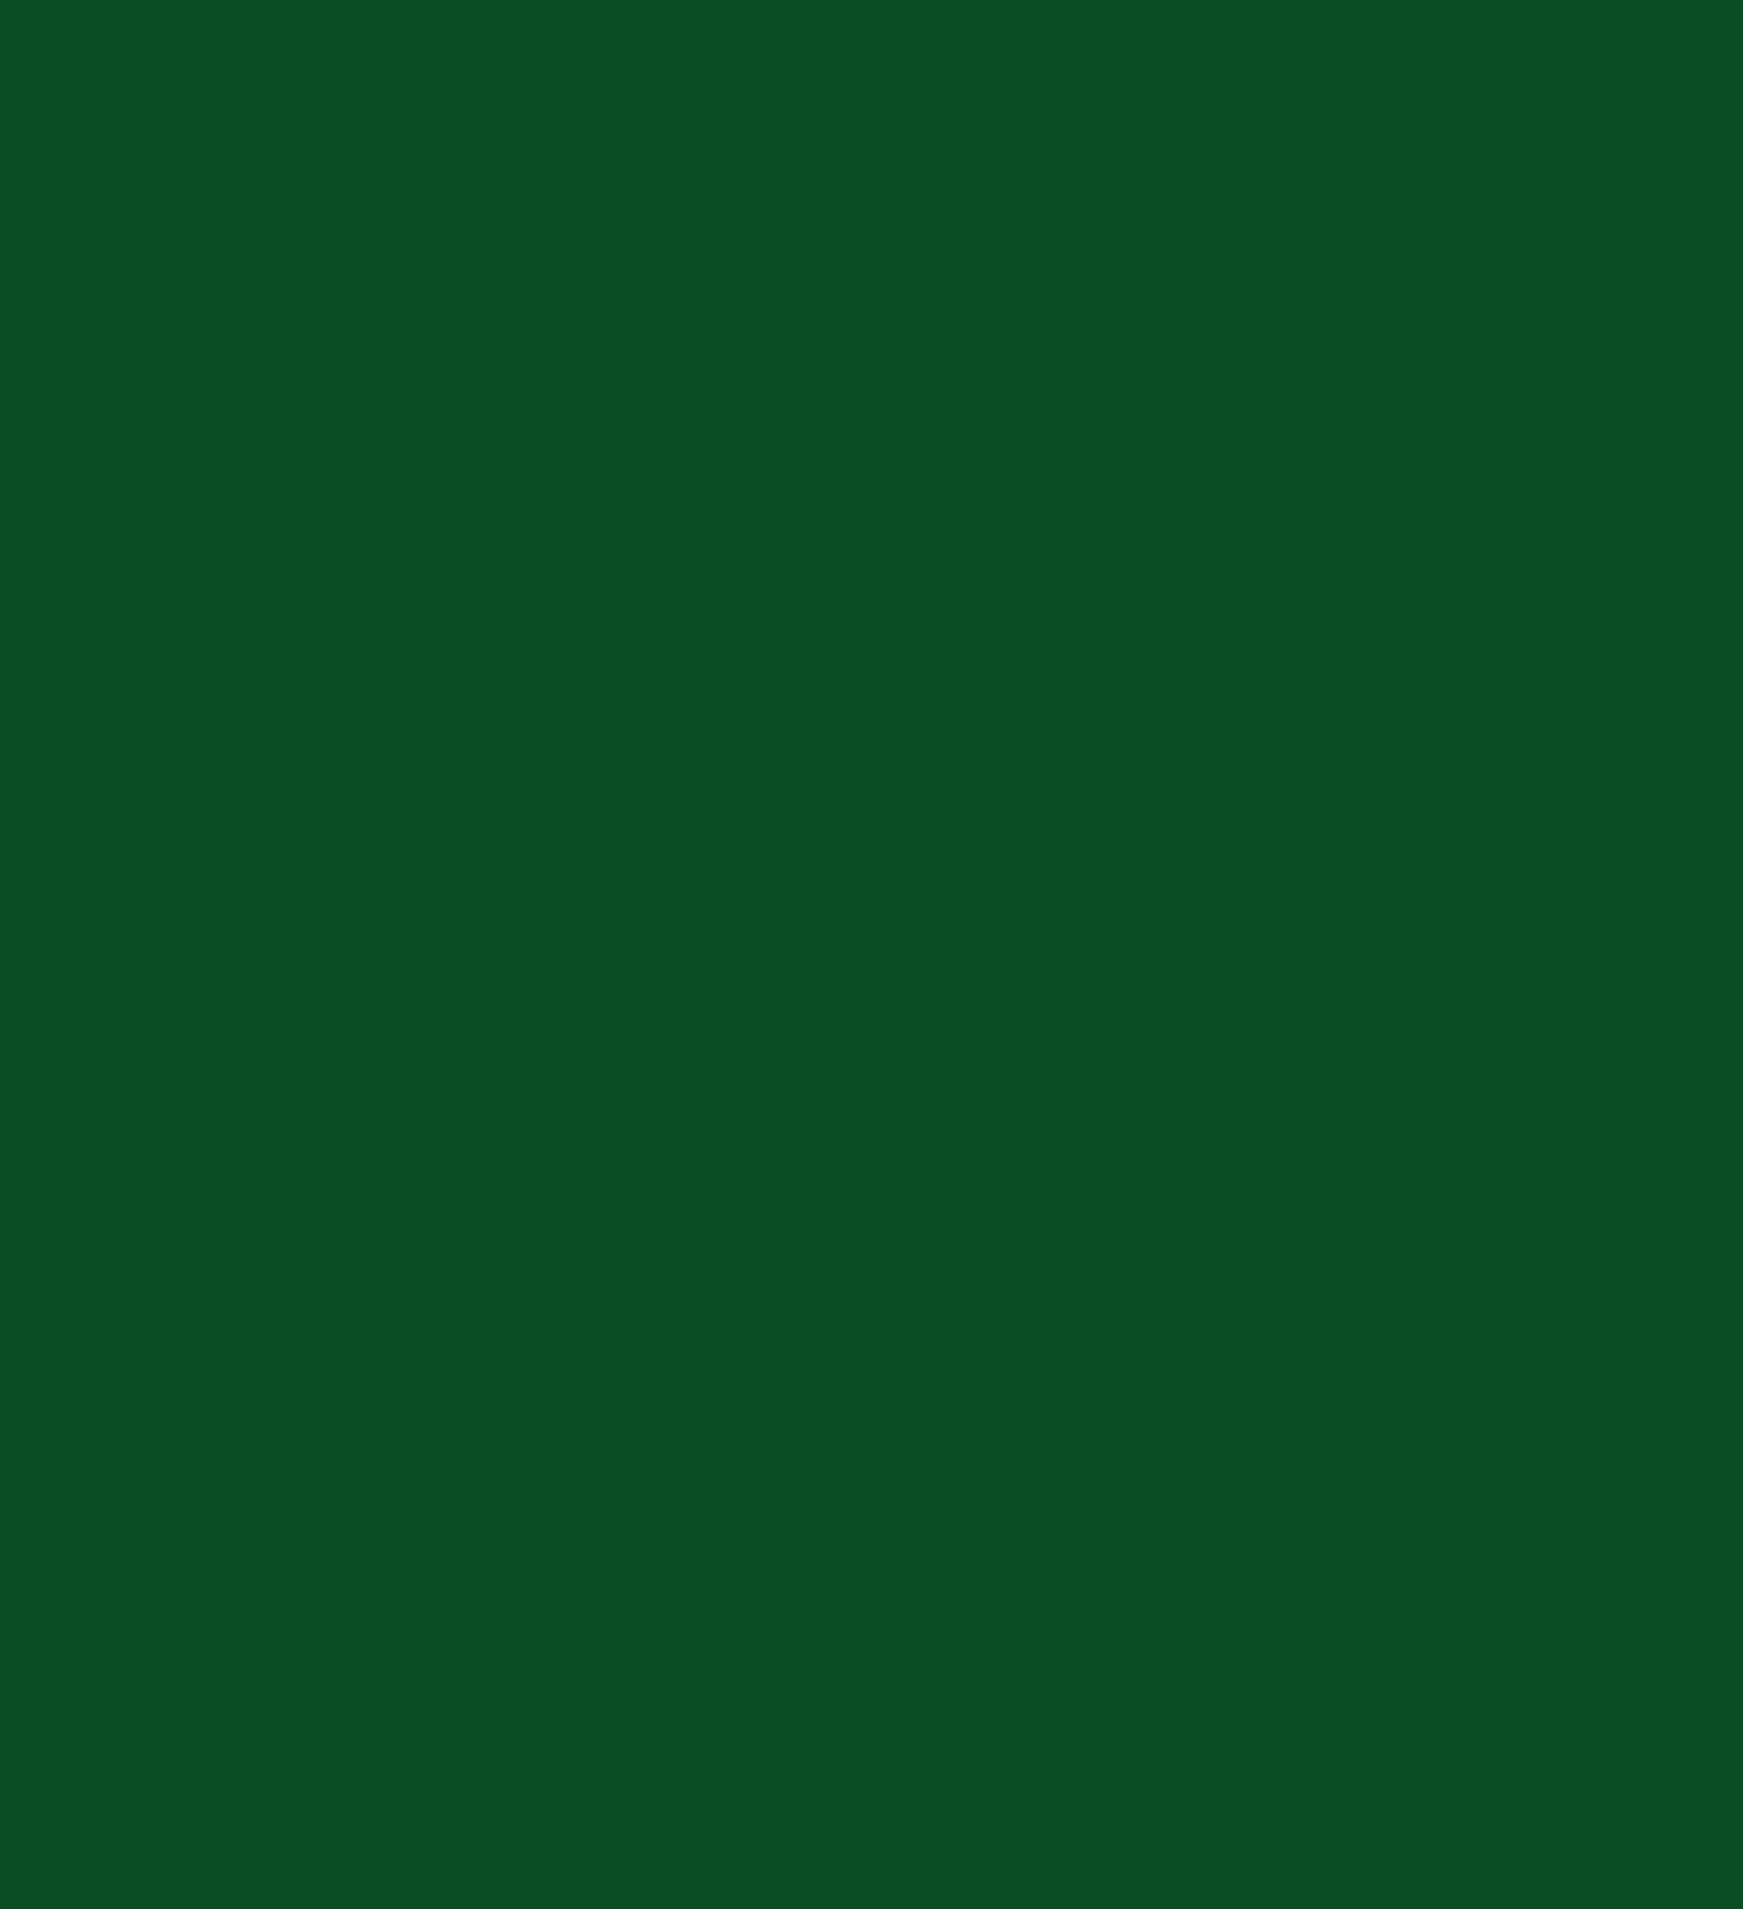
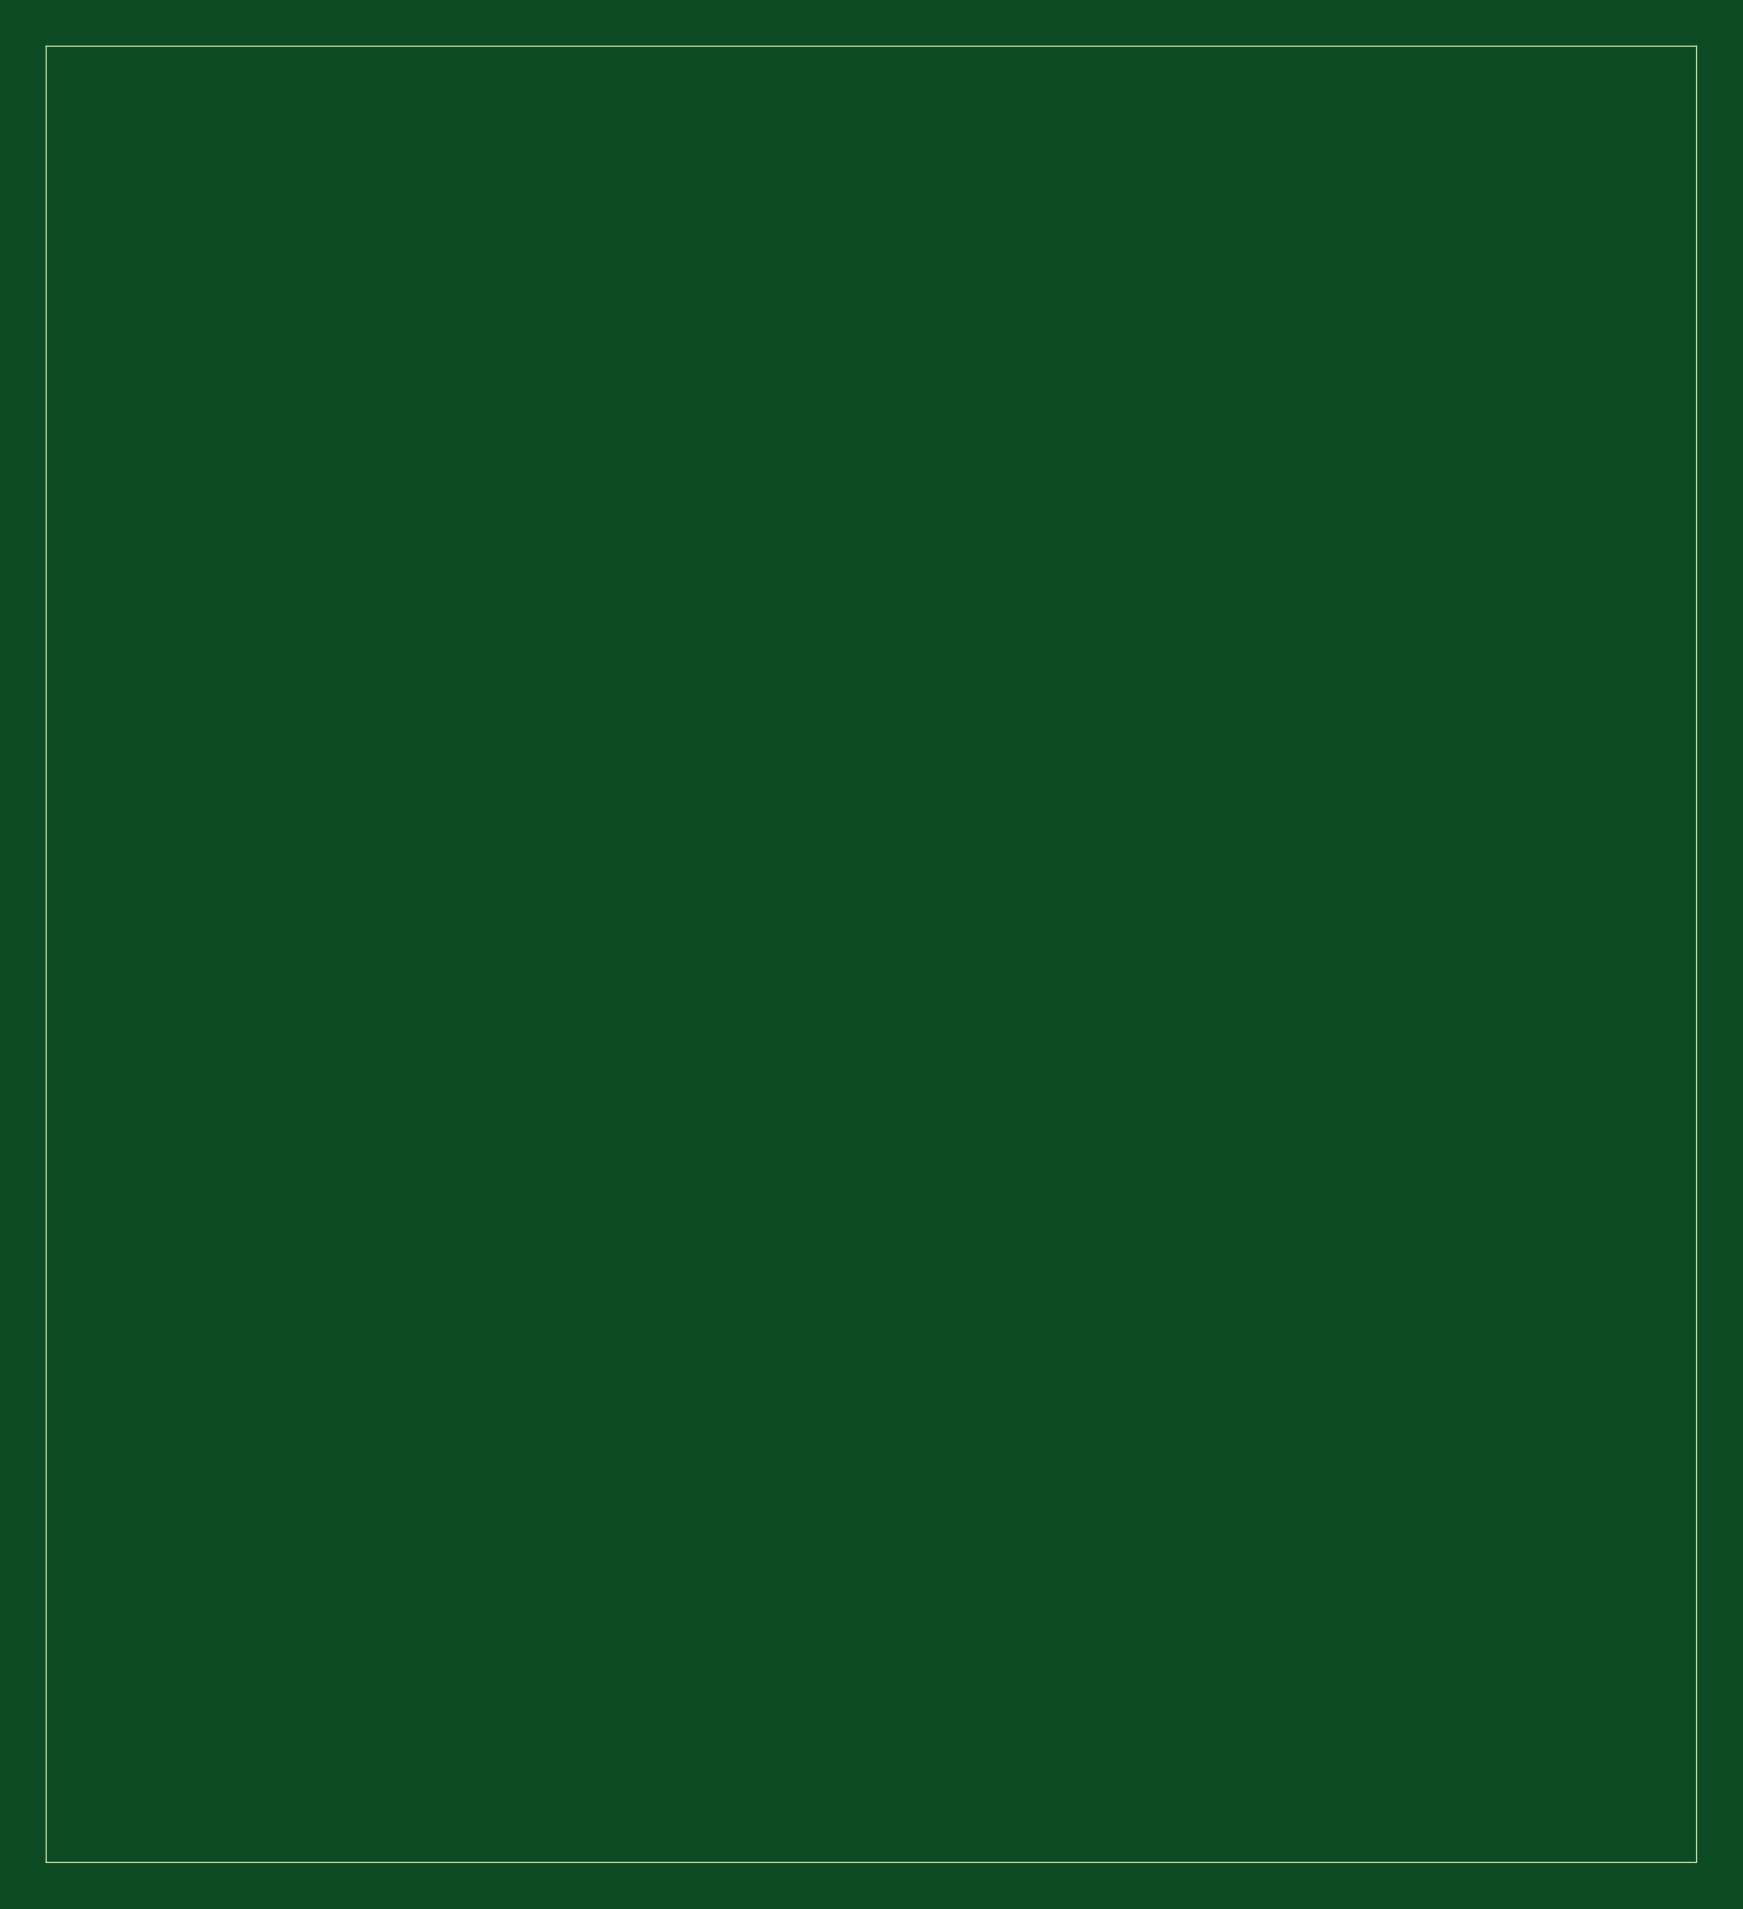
board edge: none -> (1696, 46) (46, 46) (46, 1862) (1696, 1862) (1696, 46)

